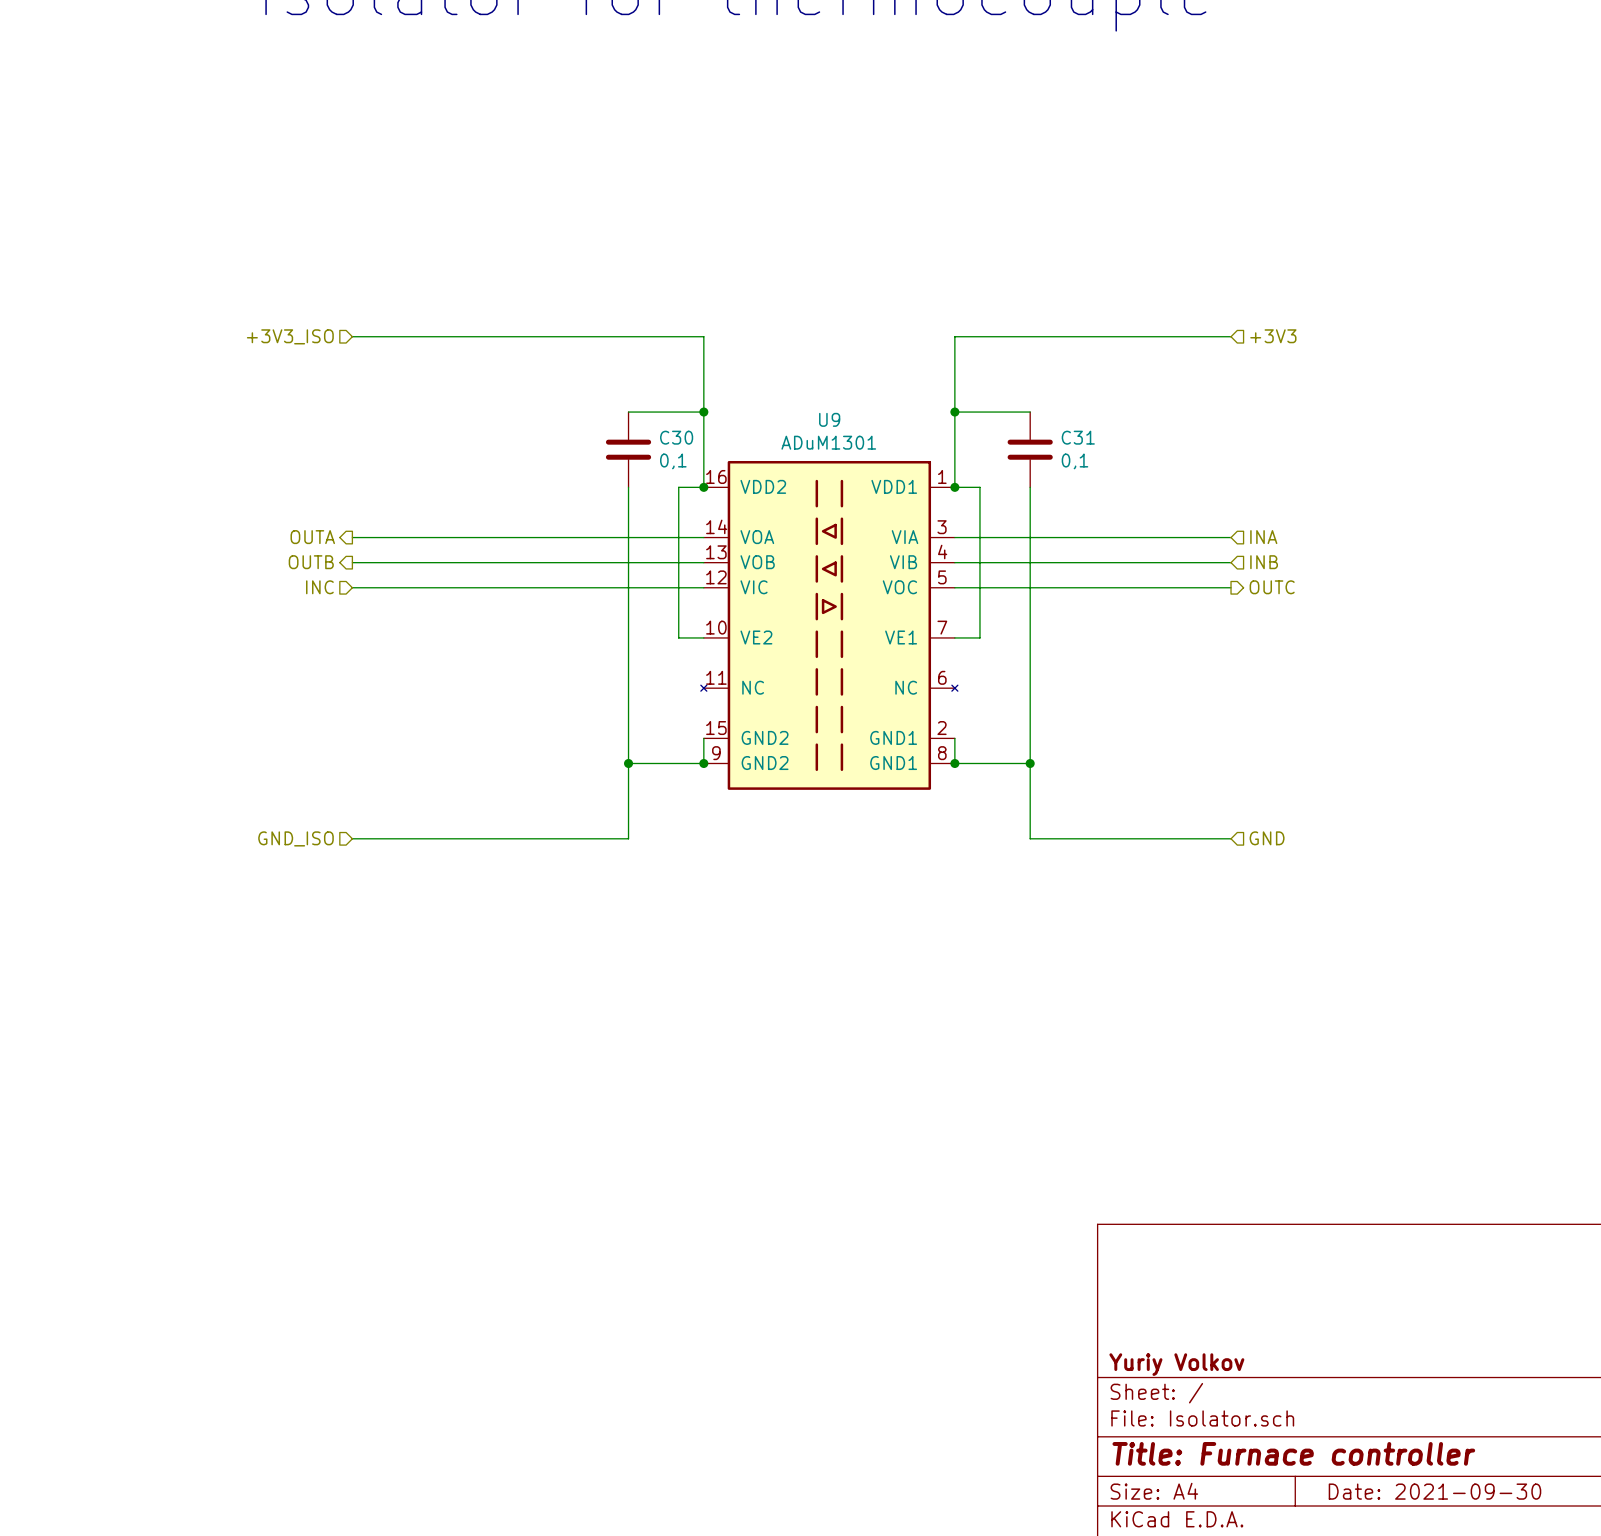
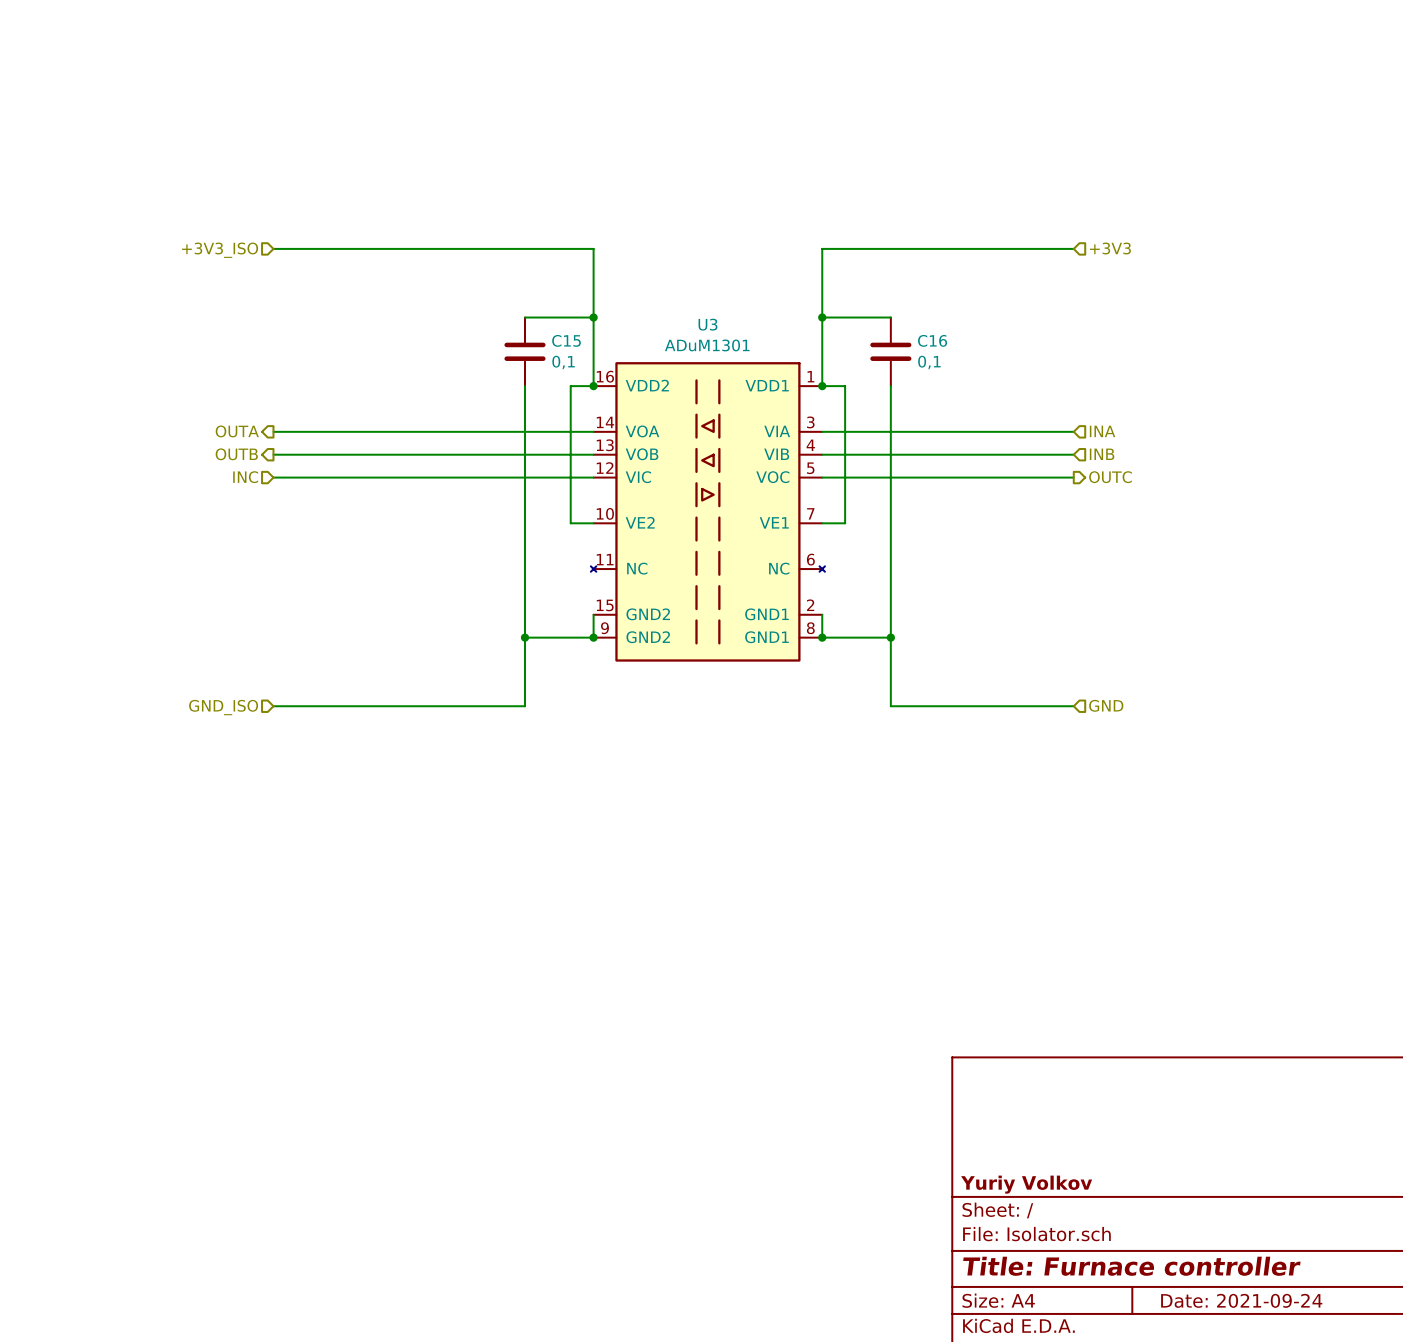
U9 name: U9 (829, 419) -> U3 (707, 324)
C30 name: C30 (676, 437) -> C15 (566, 340)
C31 name: C31 (1078, 437) -> C16 (932, 340)
title block: Date: 2021-09-30 (1434, 1491) -> Date: 2021-09-24 (1241, 1300)

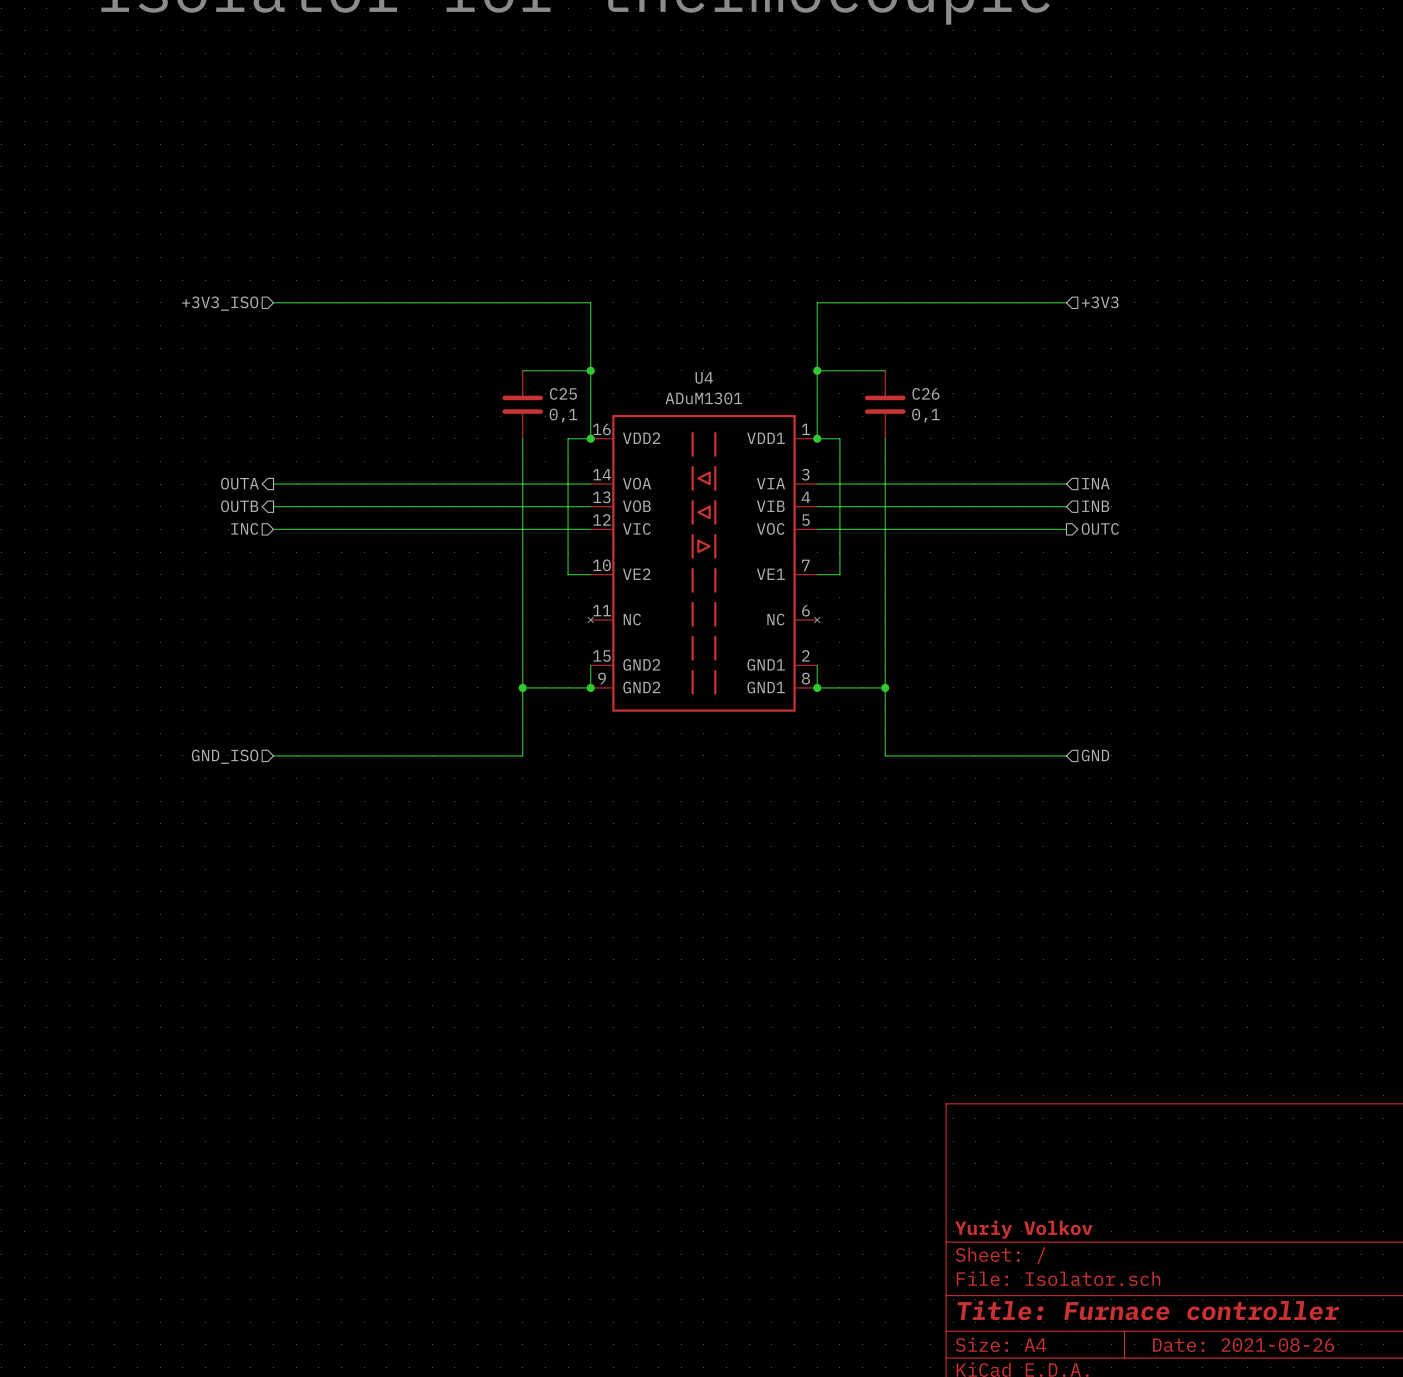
U3 name: U3 (707, 324) -> U4 (704, 377)
C15 name: C15 (566, 340) -> C25 (563, 393)
C16 name: C16 (932, 340) -> C26 (925, 393)
title block: Date: 2021-09-24 (1241, 1300) -> Date: 2021-08-26 (1243, 1345)

